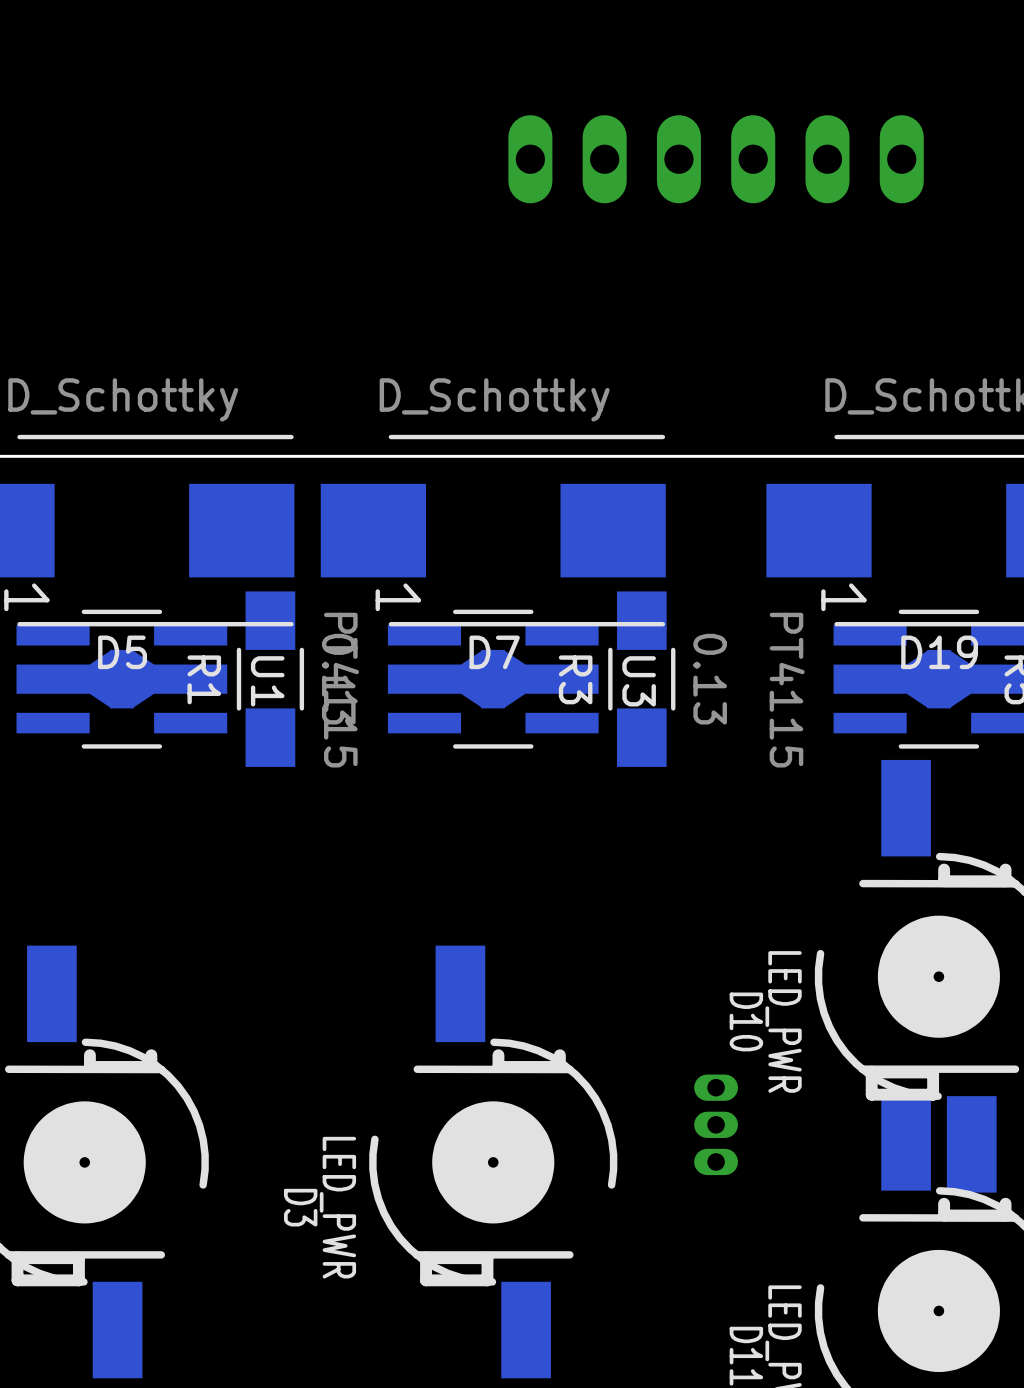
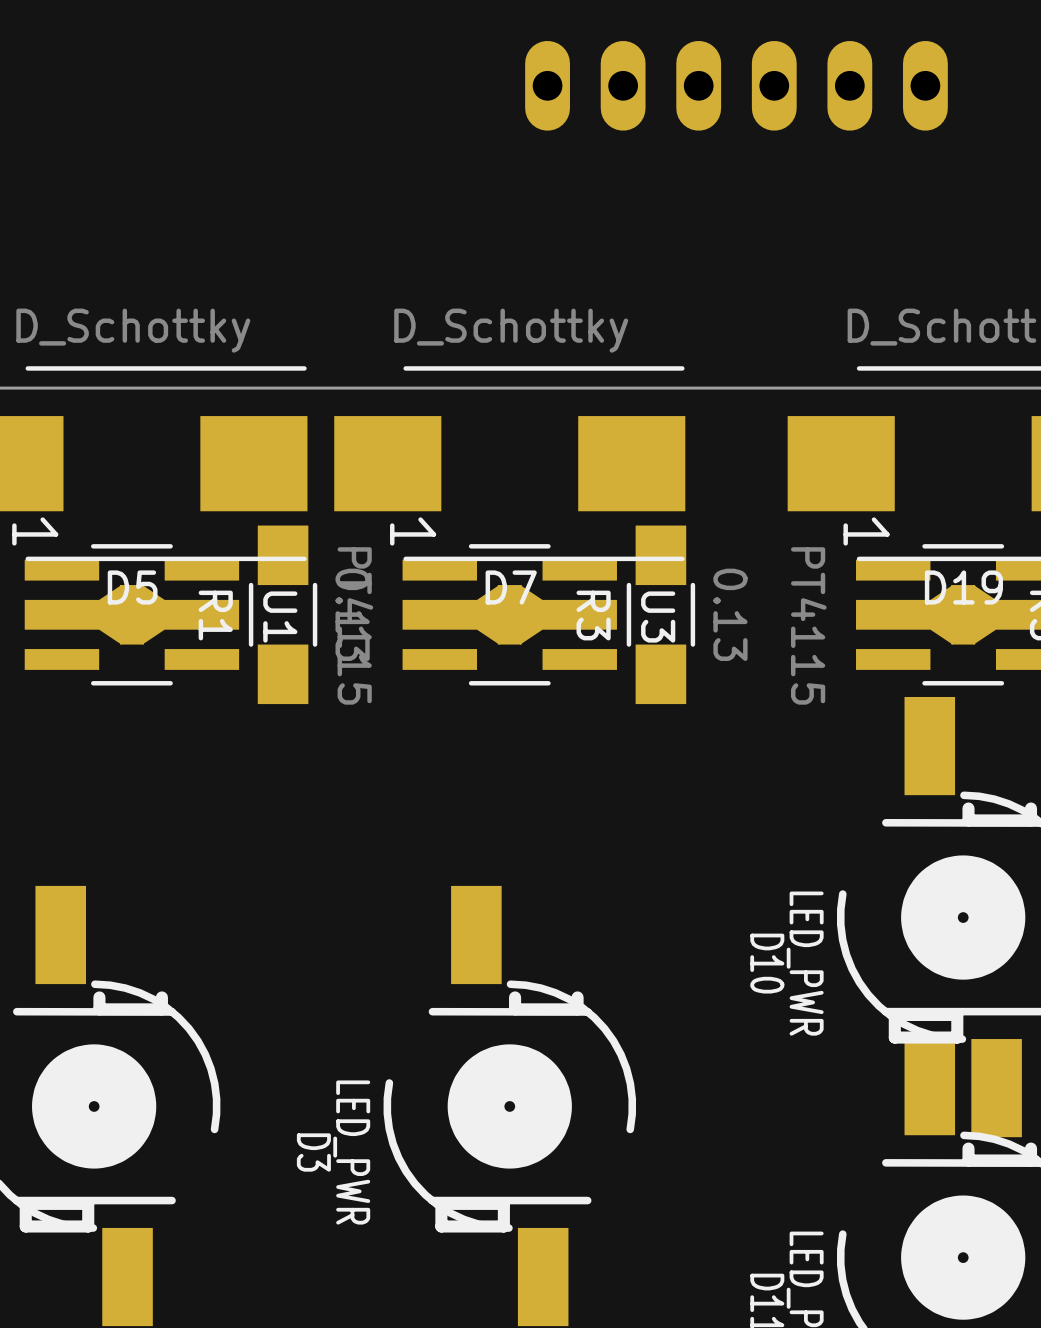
part: (716, 1124) -> none

